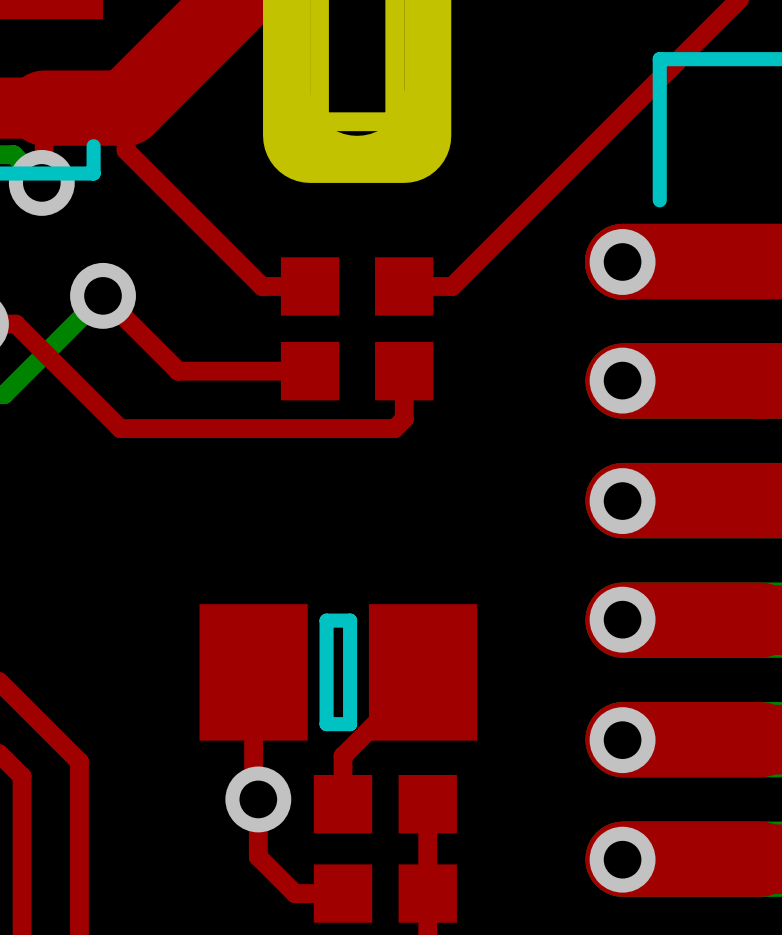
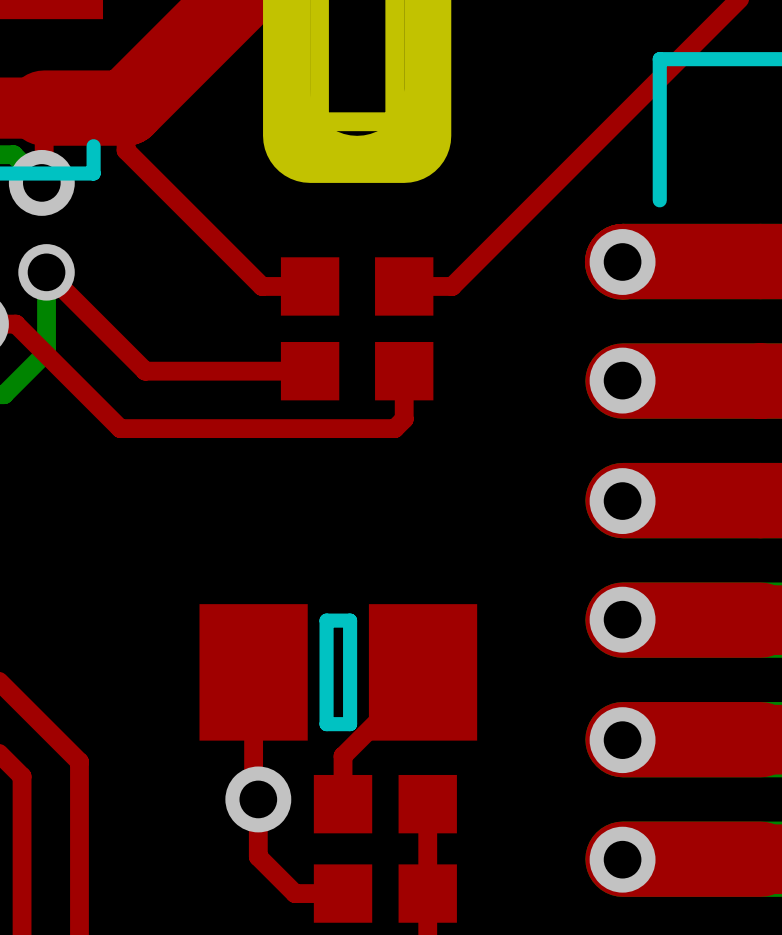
bottom track: (103, 295) (46, 352) -> (46, 272) (46, 352)
top track: (103, 295) (178, 371) -> (46, 272) (145, 371) (178, 371)
via position: (103, 295) -> (46, 272)

